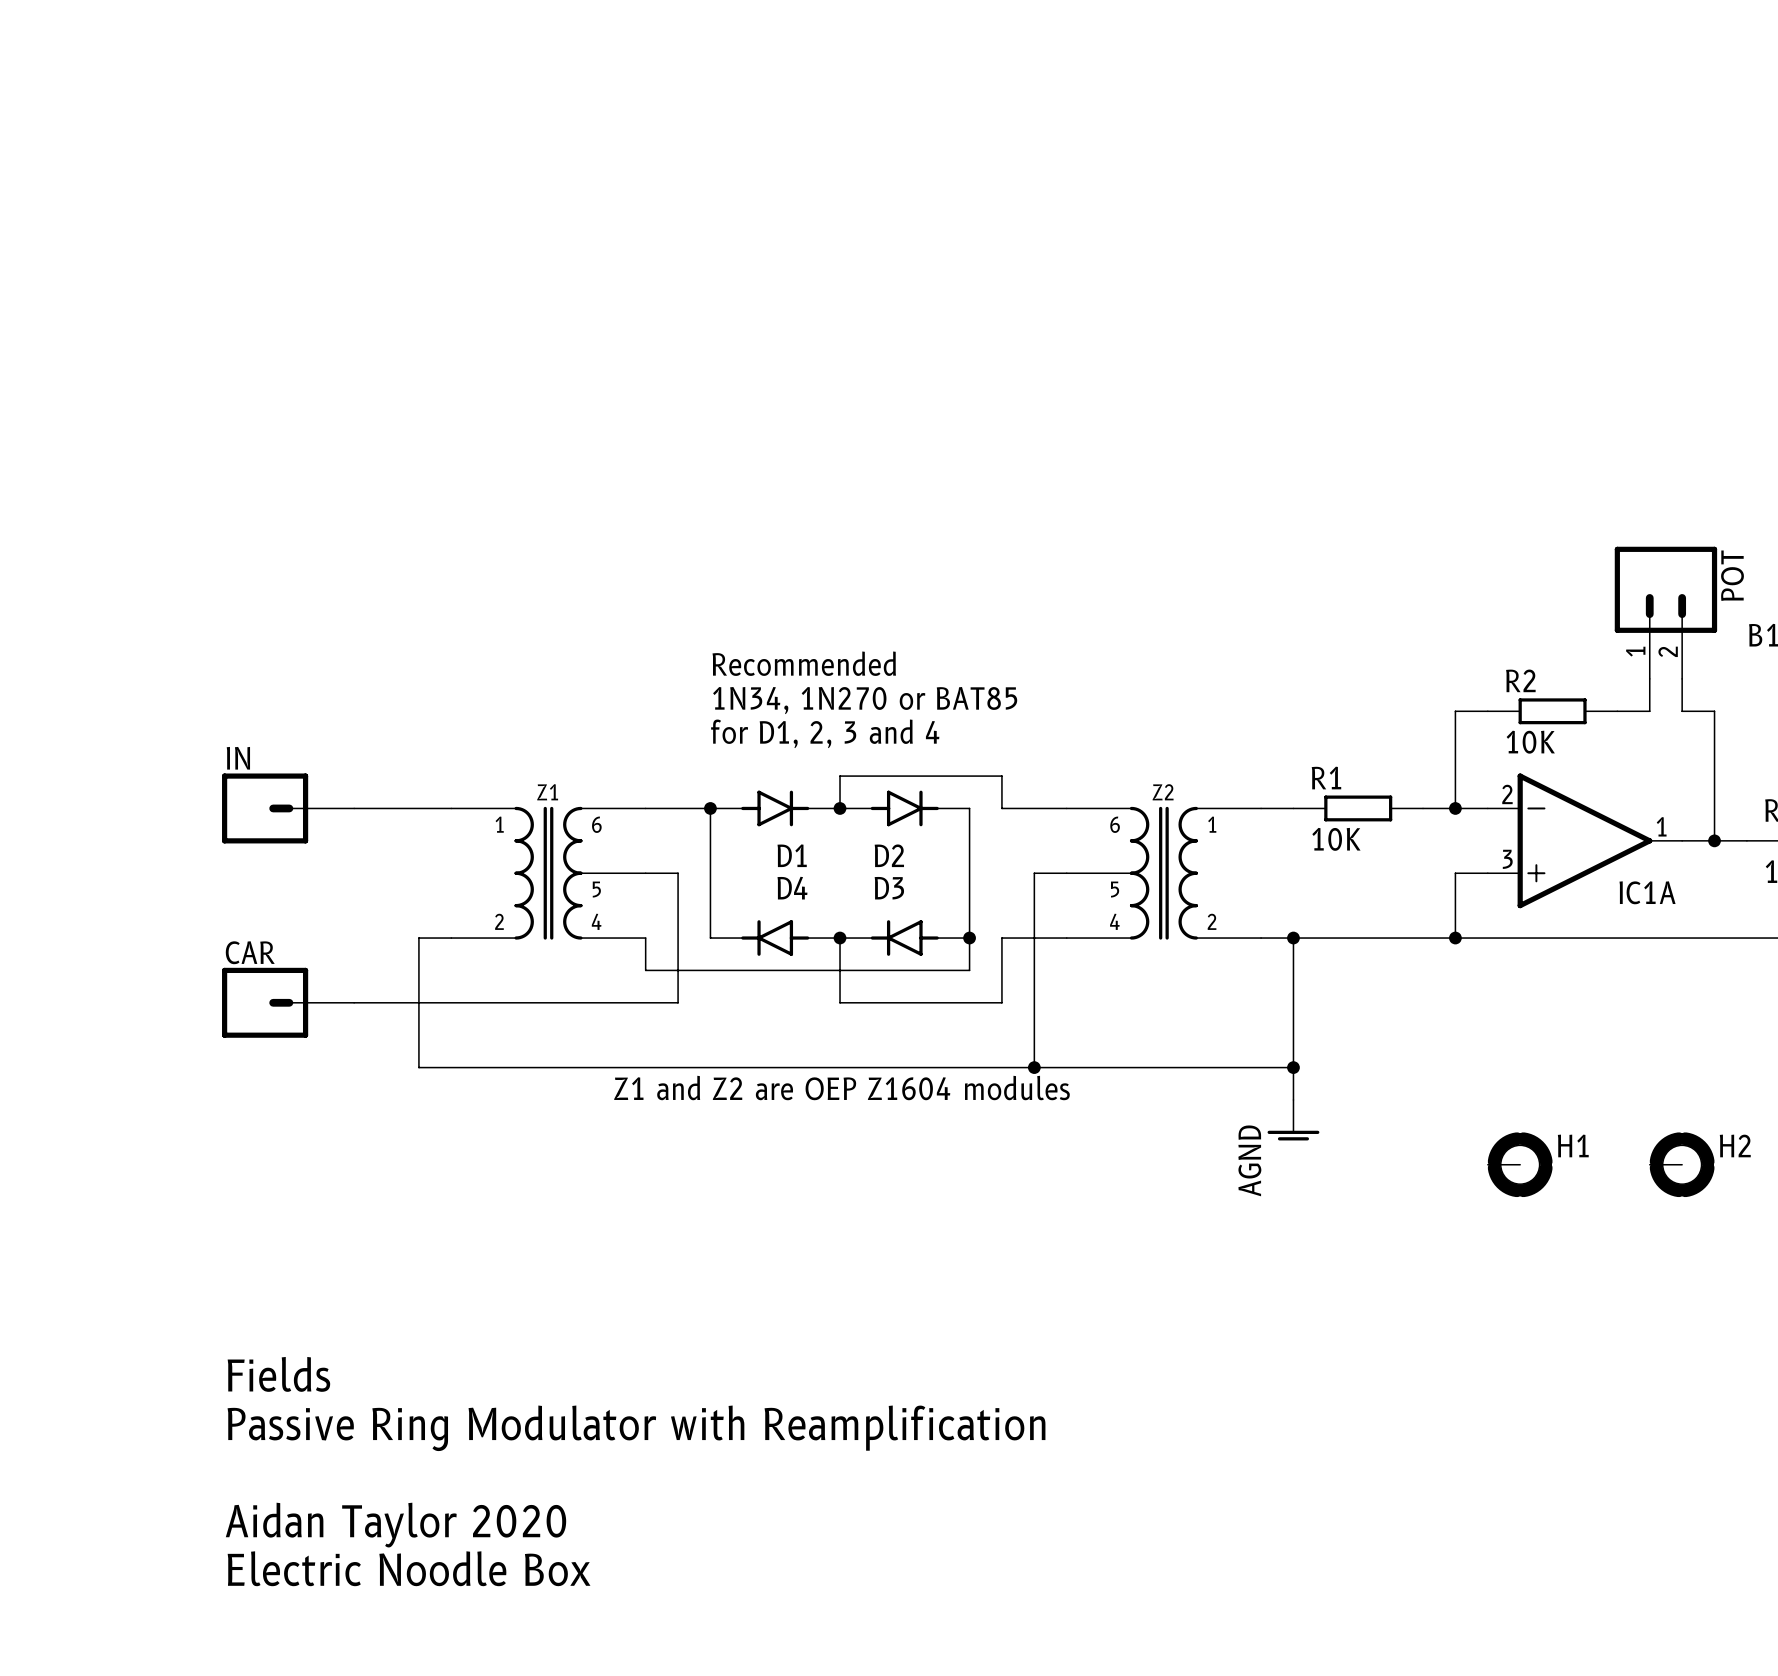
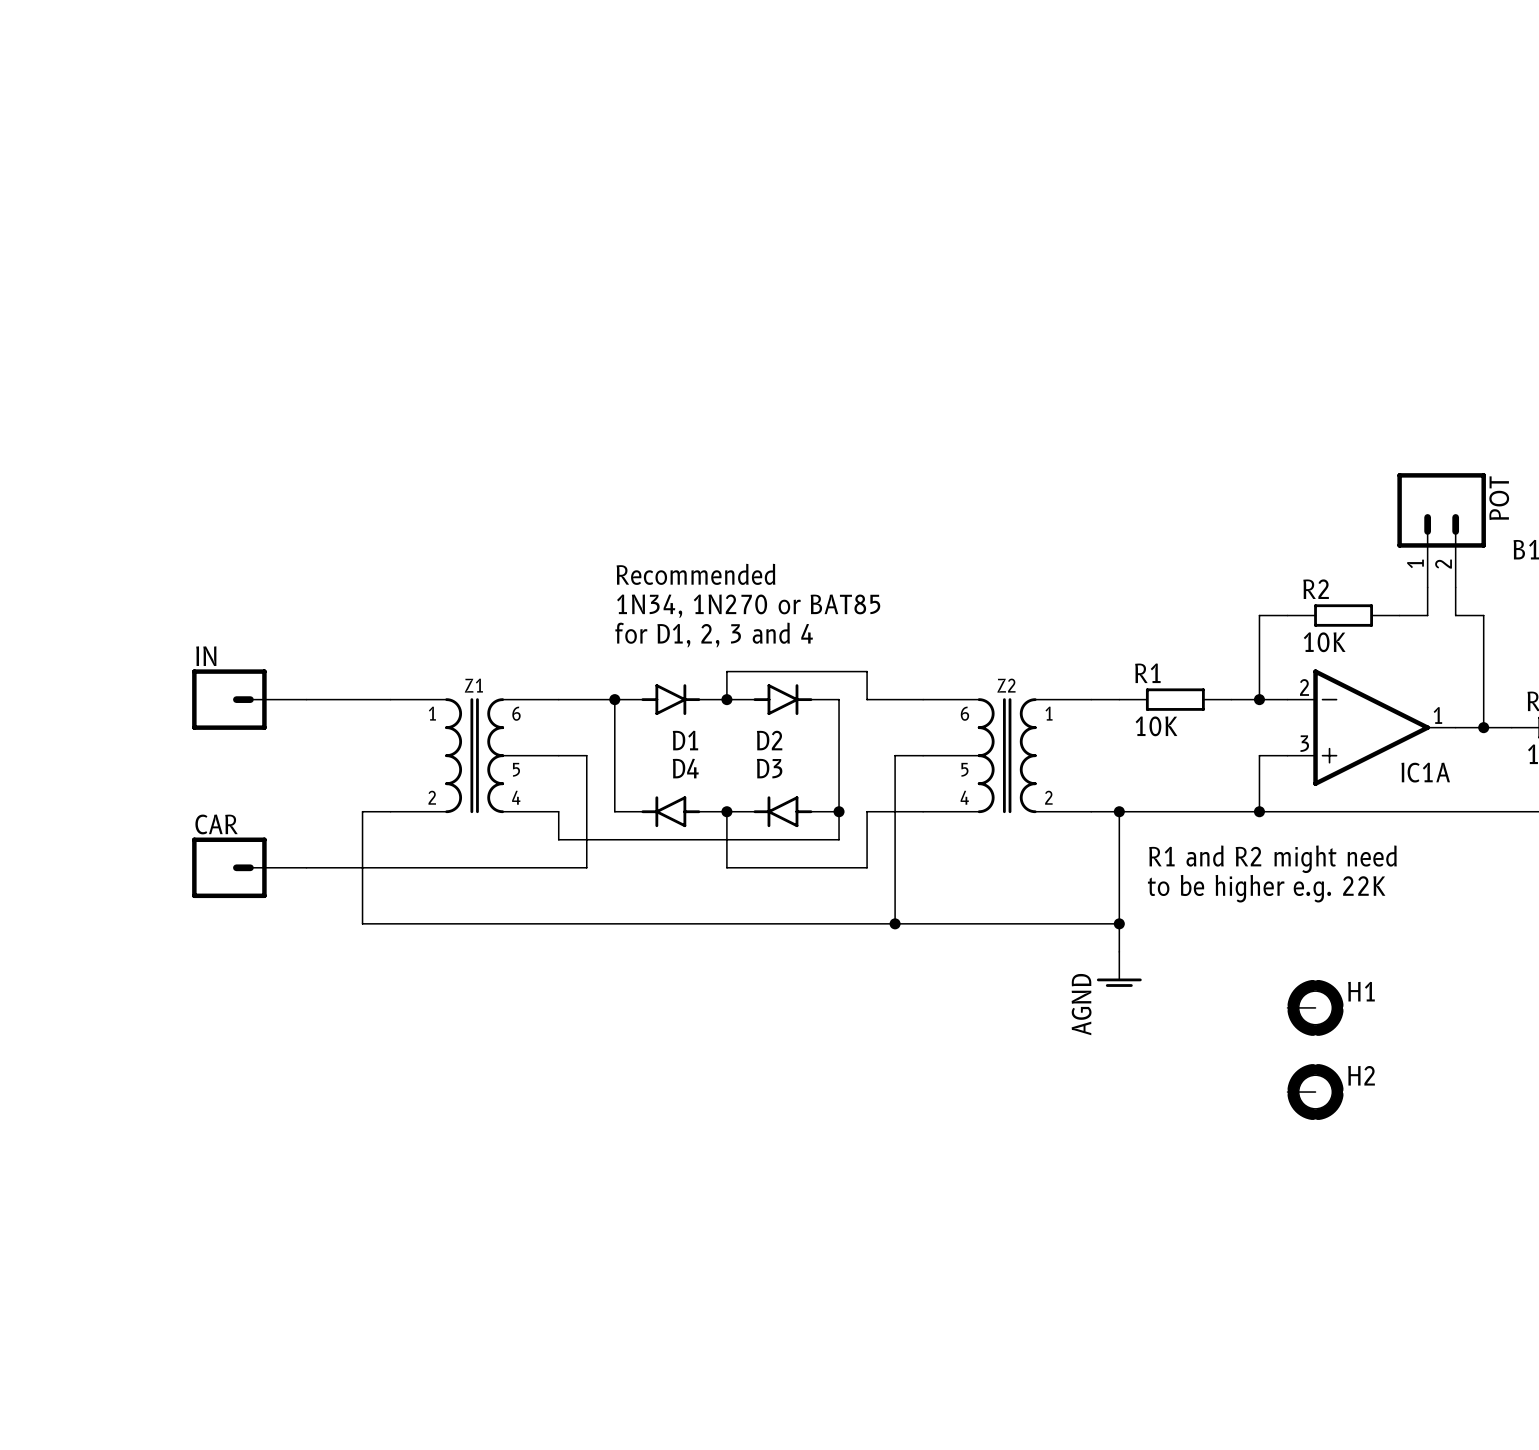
text: none -> R1 and R2 might need (1272, 859)
text: none -> to be higher e.g. 22K (1266, 888)
text: Z1 and Z2 are OEP Z1604 modules (841, 1088) -> none
H2 position: (1682, 1164) -> (1315, 1092)
text: Fields (278, 1374) -> none
text: Passive Ring Modulator with Reamplification (636, 1428) -> none
text: Aidan Taylor 2020 (395, 1525) -> none
text: Electric Noodle Box (409, 1568) -> none

